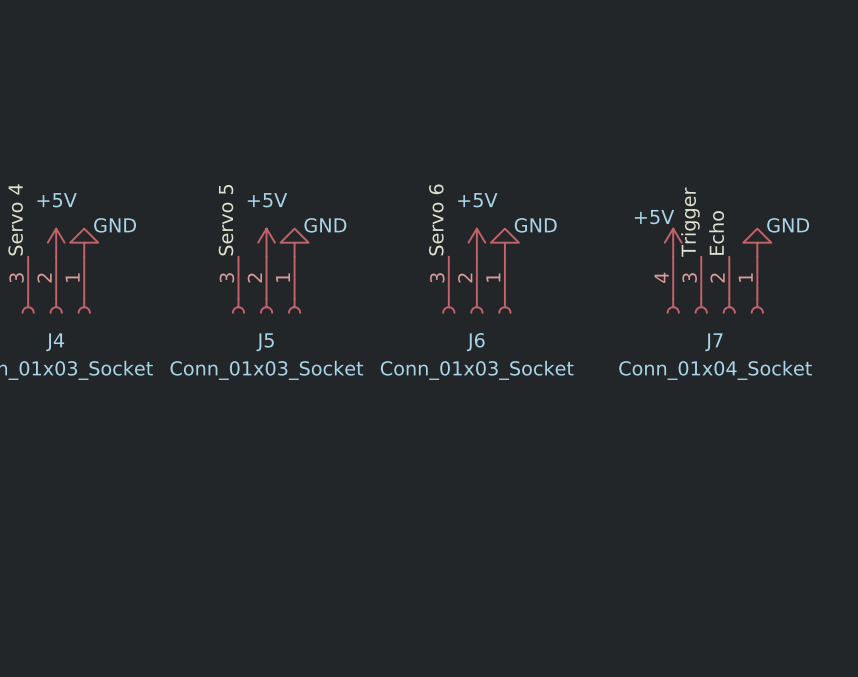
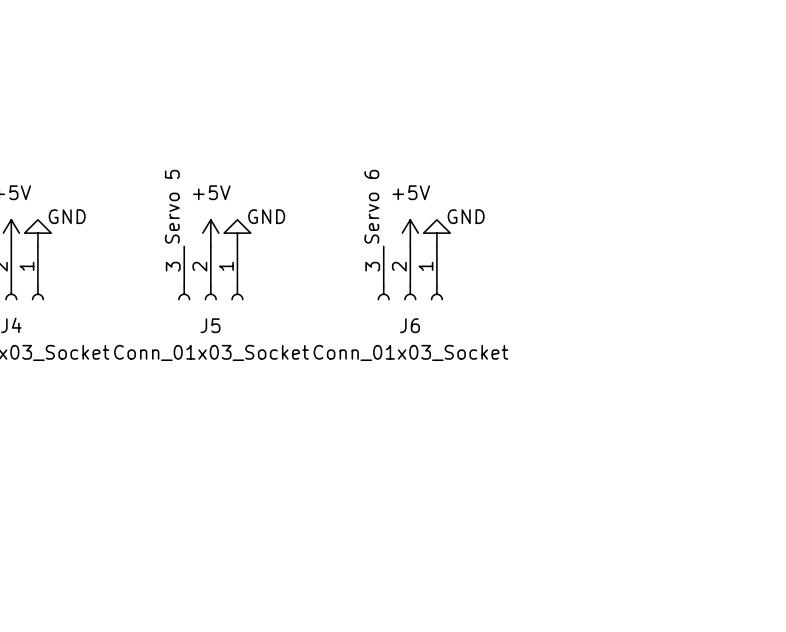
label: Trigger (690, 222) -> none
label: Echo (716, 232) -> none
power symbol: +5V (673, 242) -> none
power symbol: GND (757, 242) -> none
J7: Conn_01x04_Socket (715, 285) -> none

